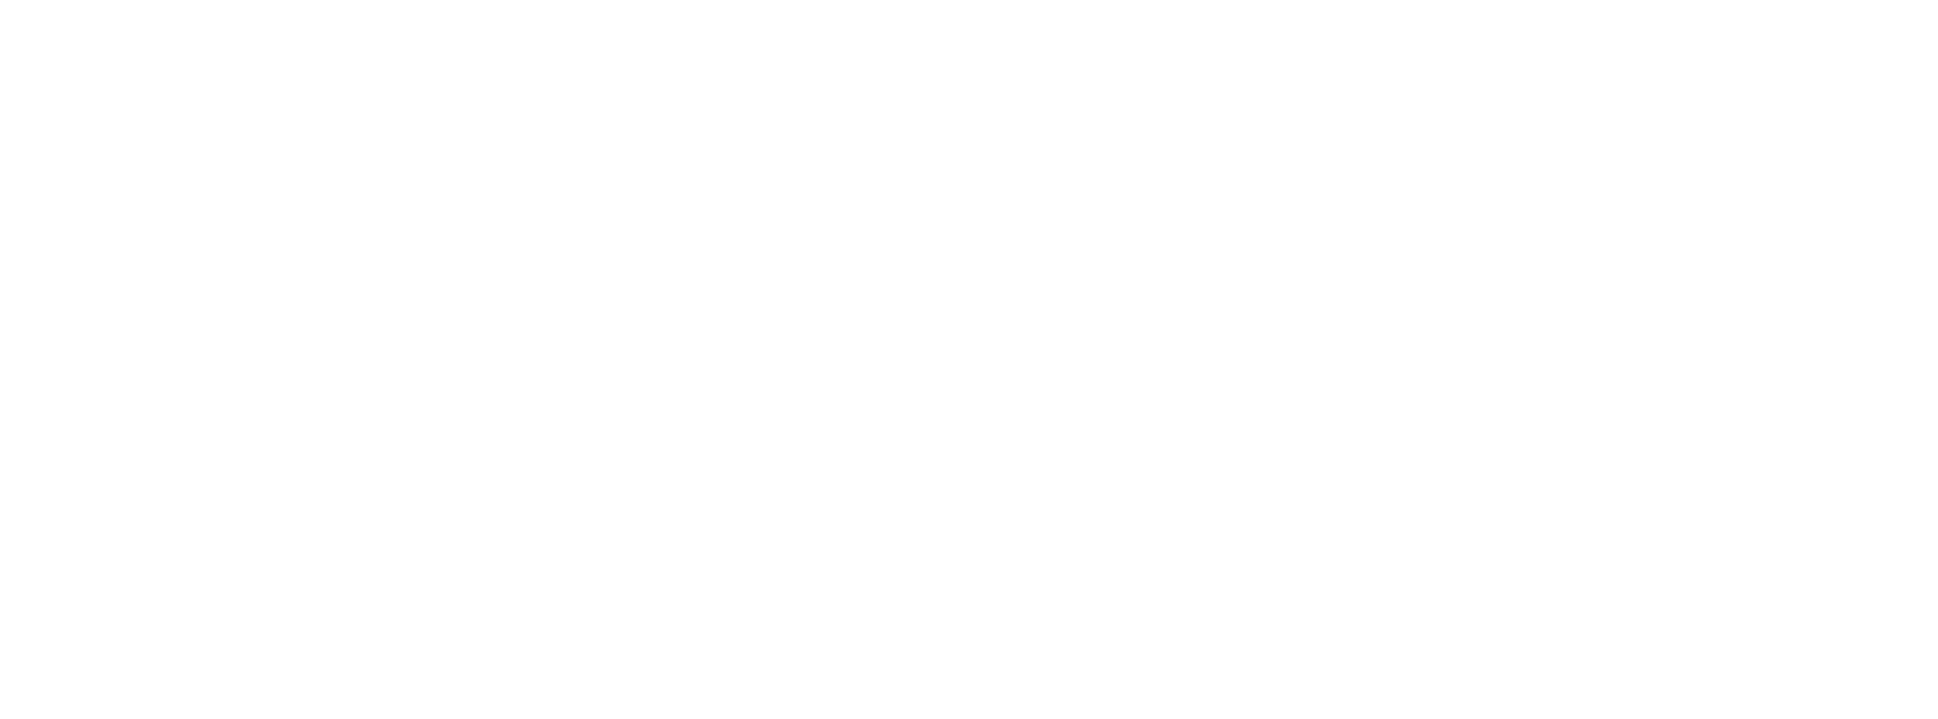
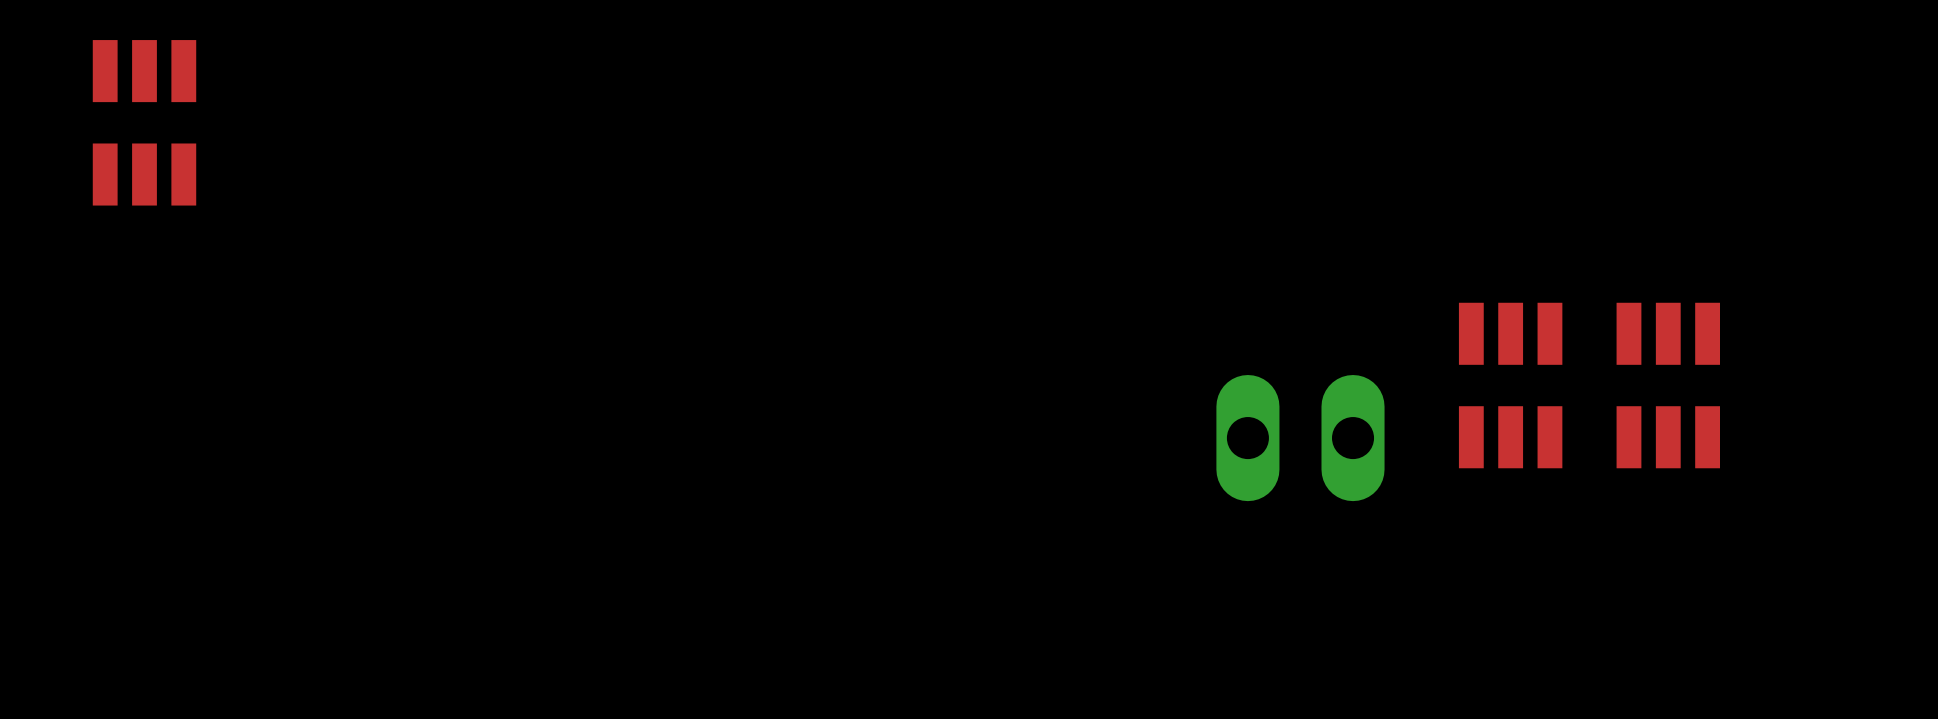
part: none -> (144, 122)
part: none -> (1510, 385)
part: none -> (1668, 385)
part: none -> (1300, 438)

